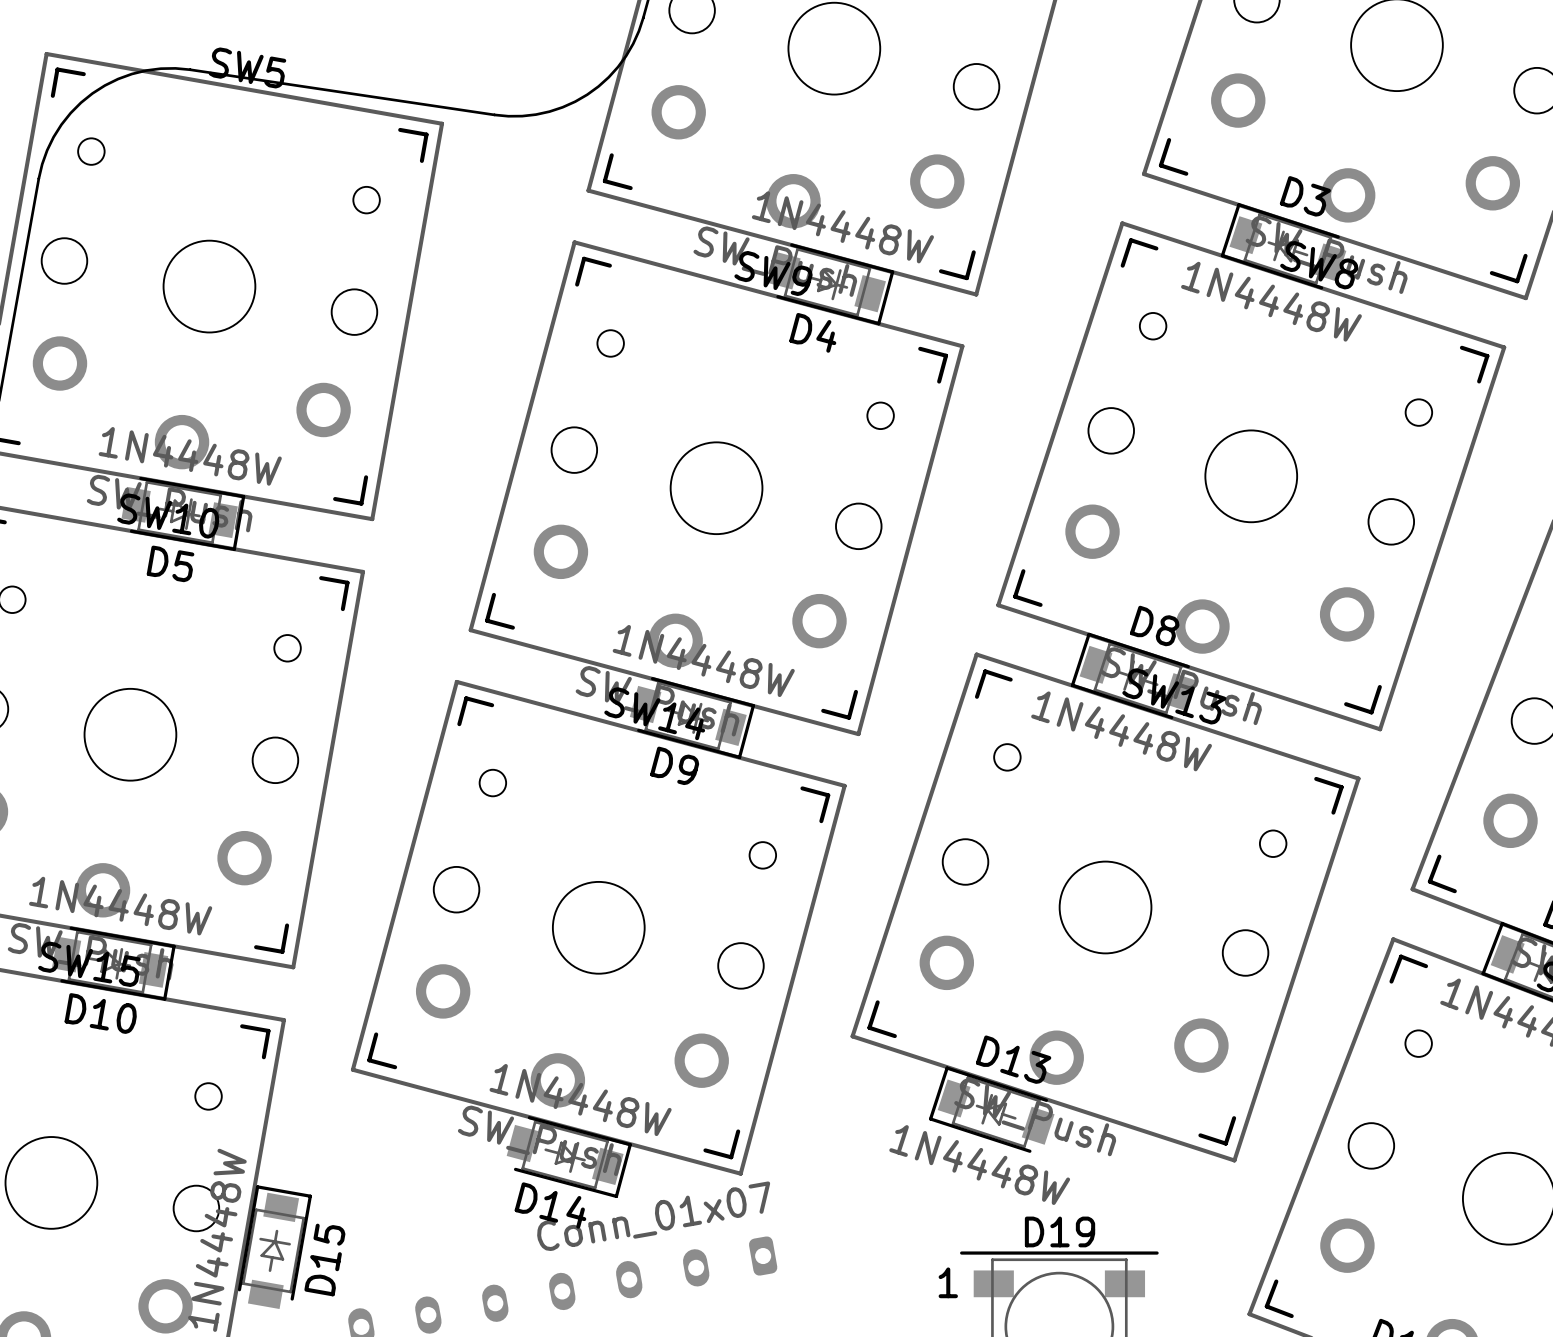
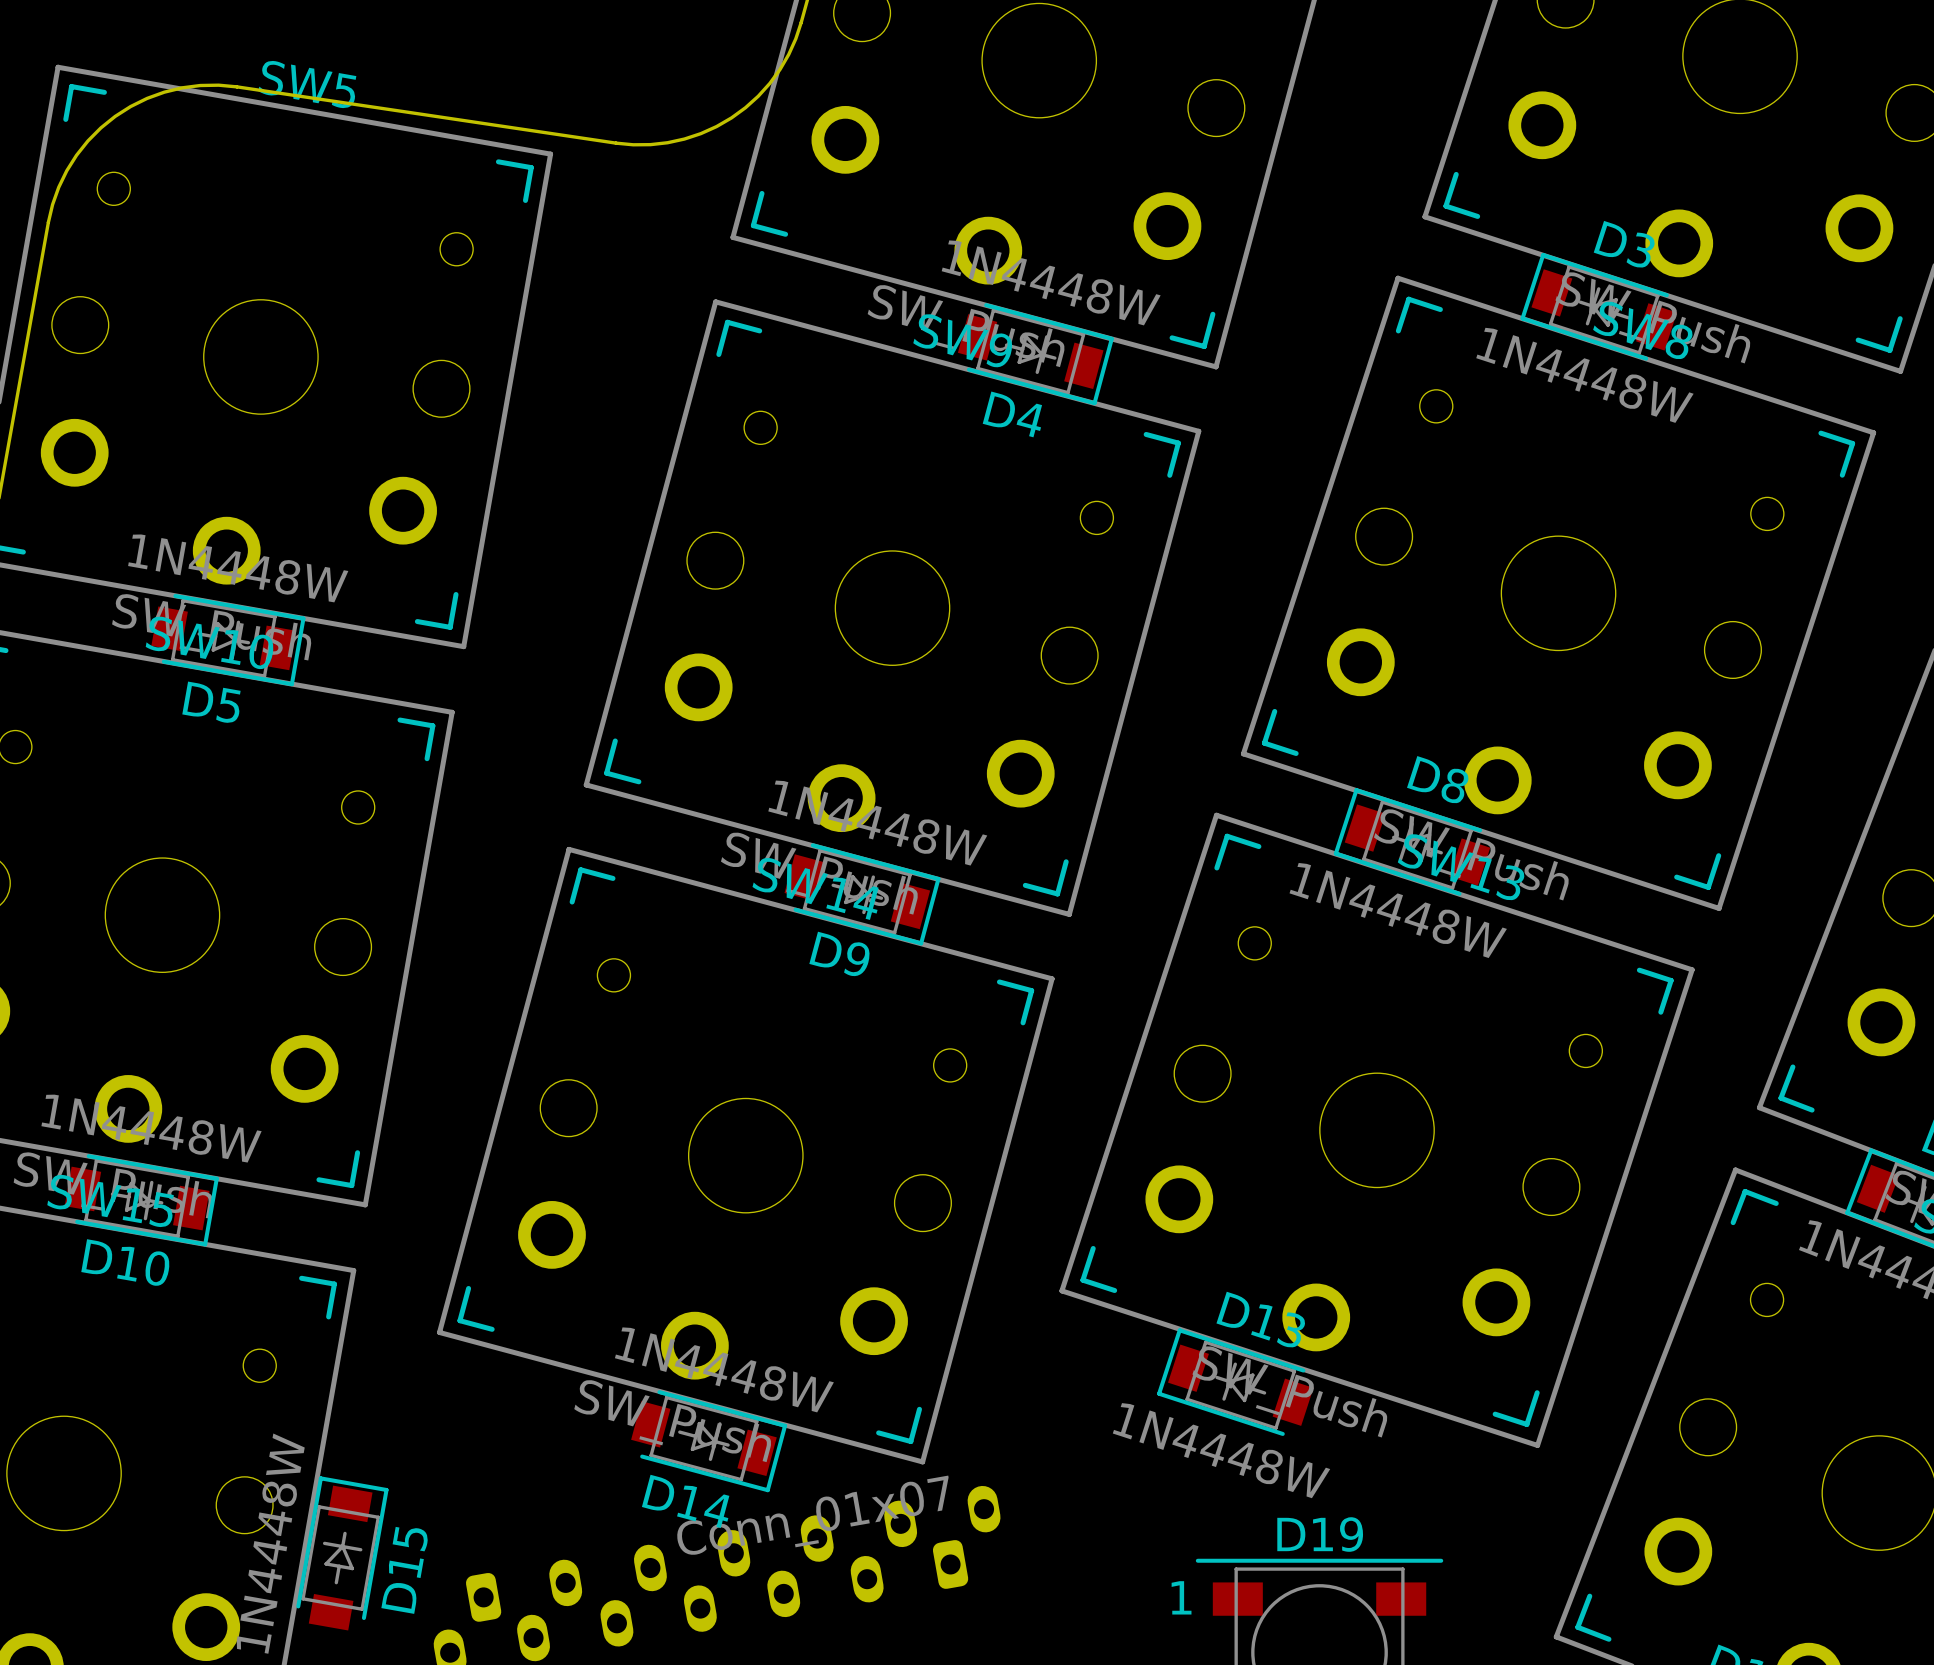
part: none -> (733, 1553)

